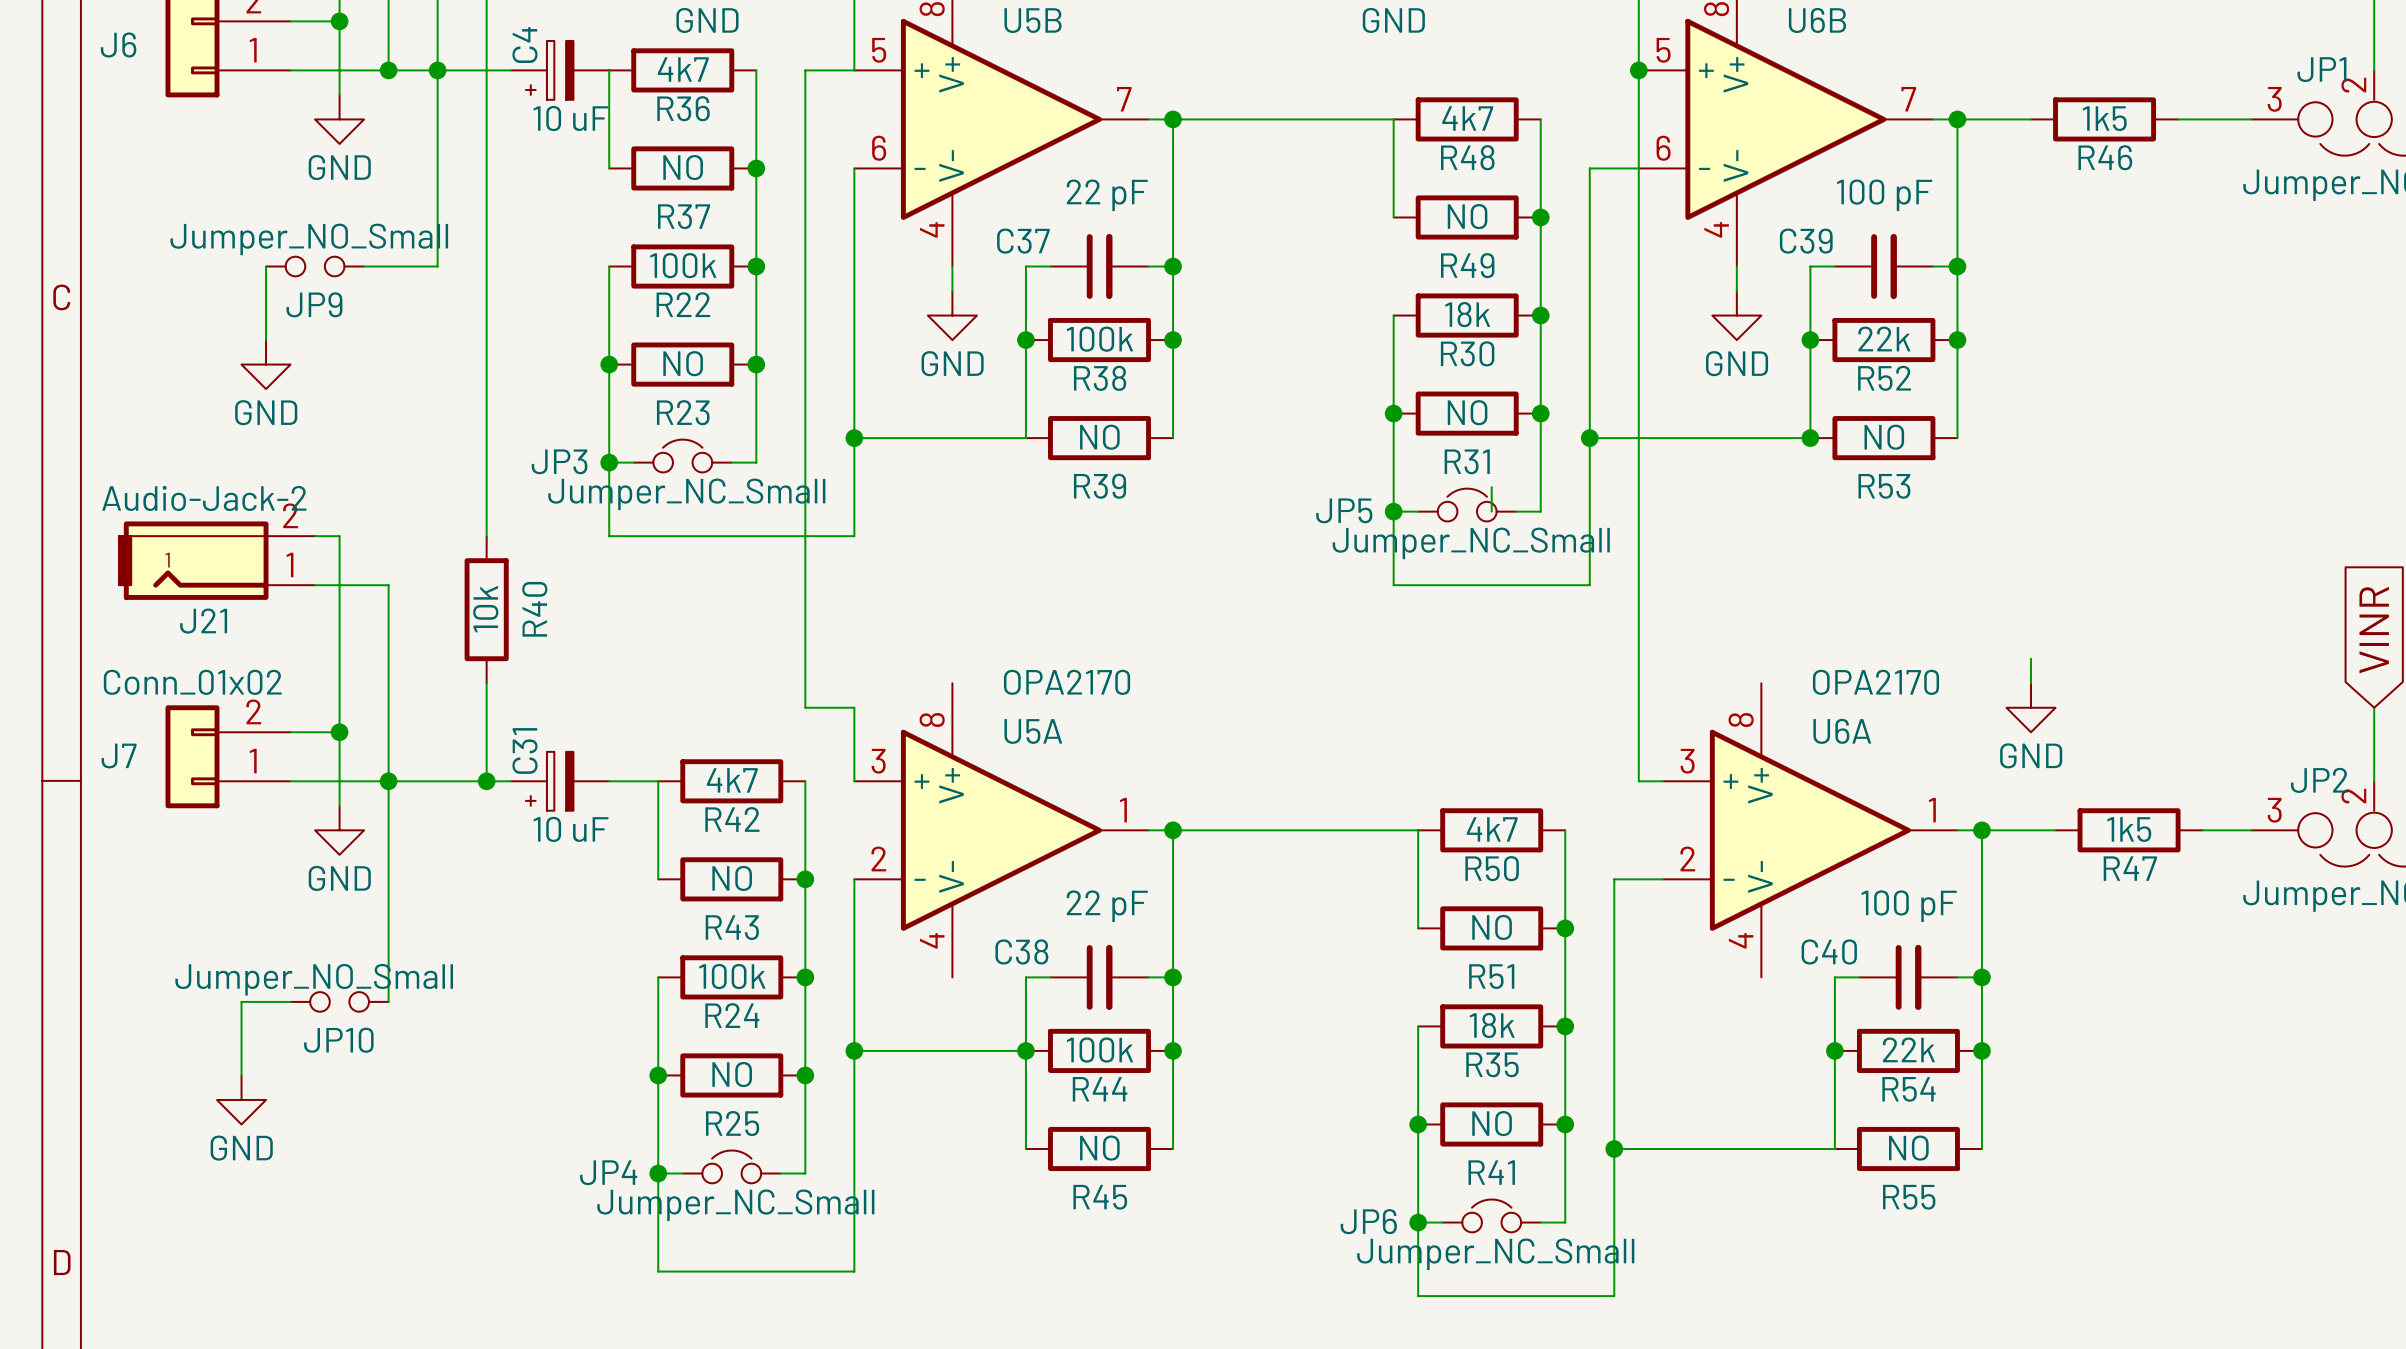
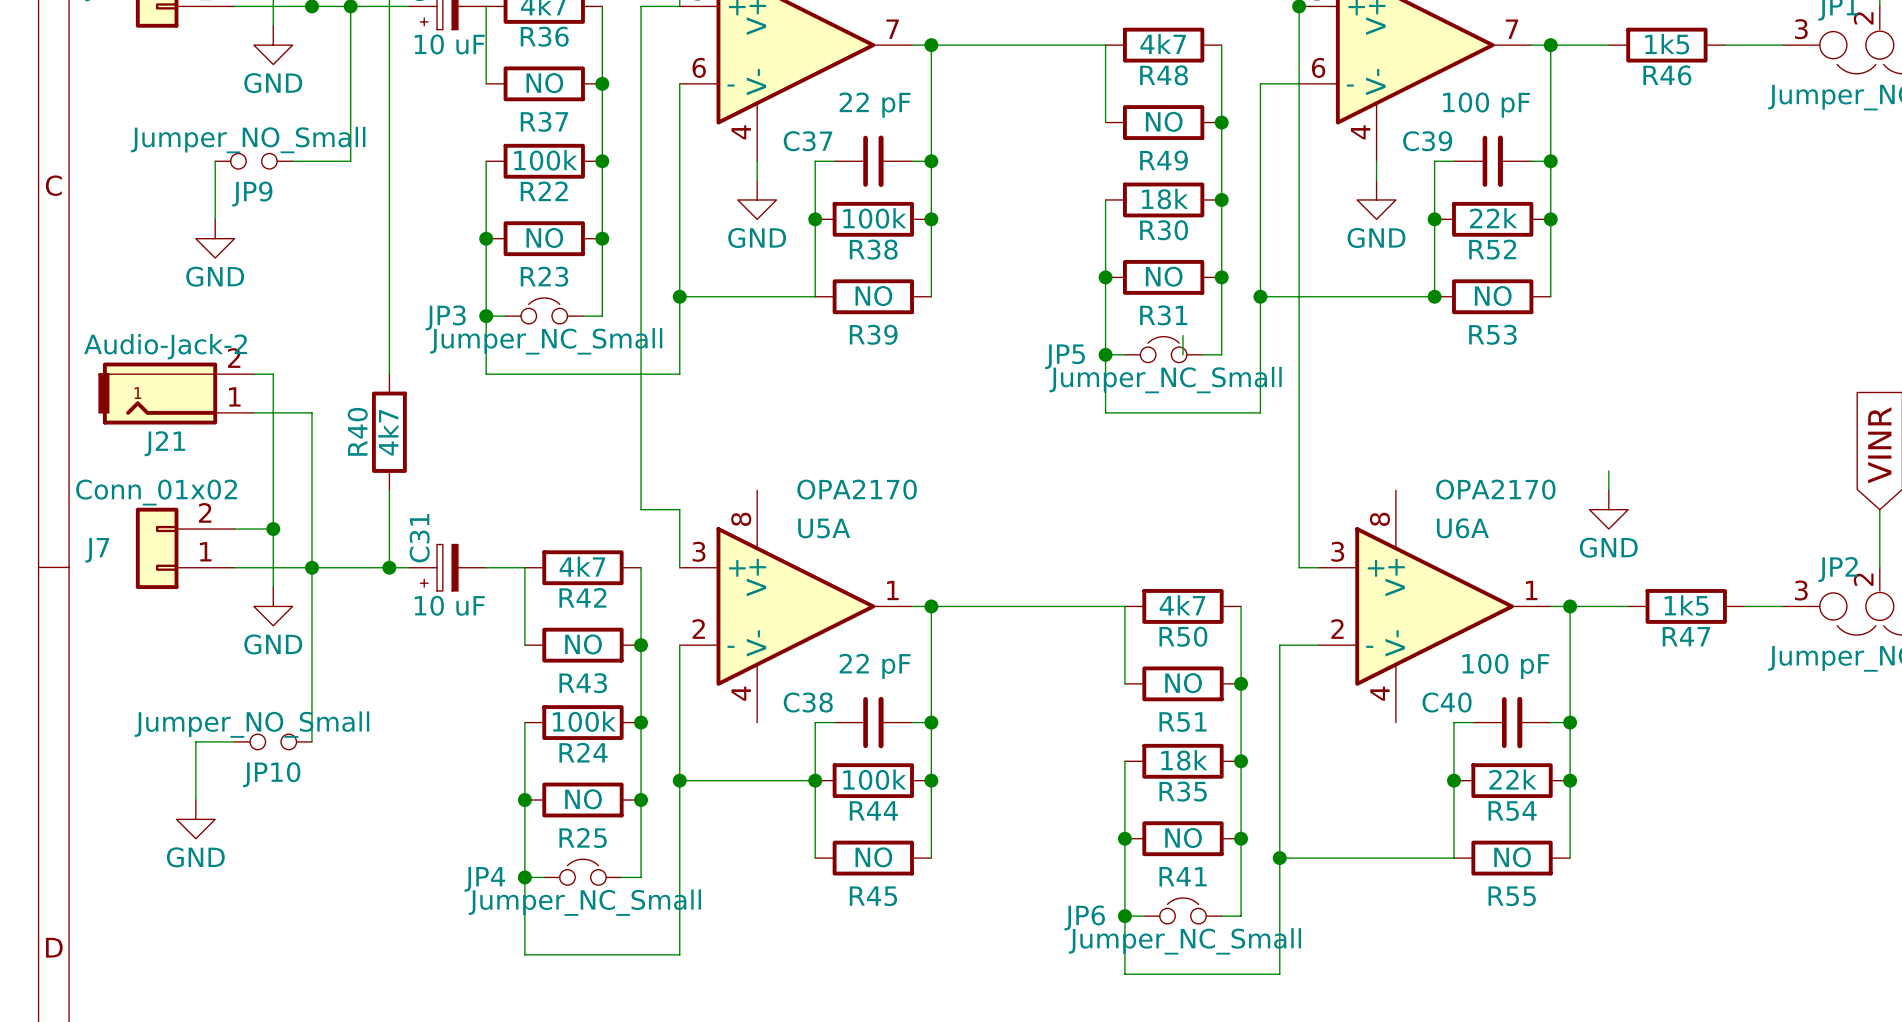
R40 value: 10k (485, 609) -> 4k7 (388, 432)
R40 name position: R40 (534, 609) -> R40 (357, 431)

